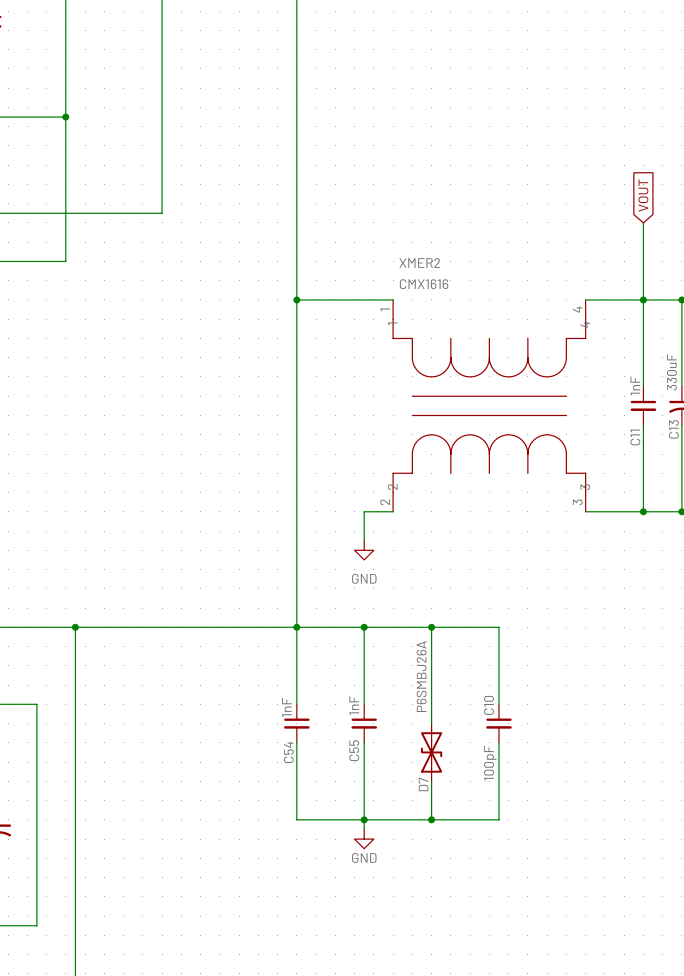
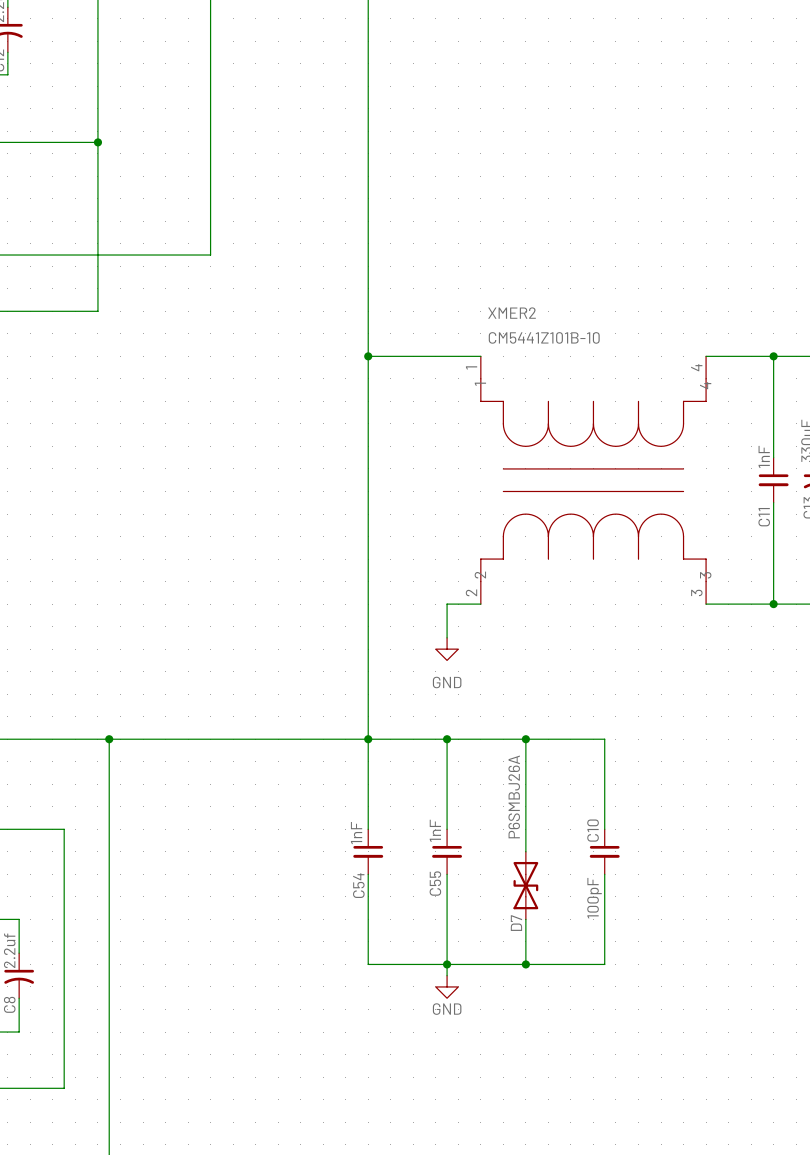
global label: VOUT (643, 195) -> none
wire: (643, 222) (643, 299) -> none
XMER2 value: CMX1616 (424, 284) -> CM5441Z101B-10 (544, 337)

